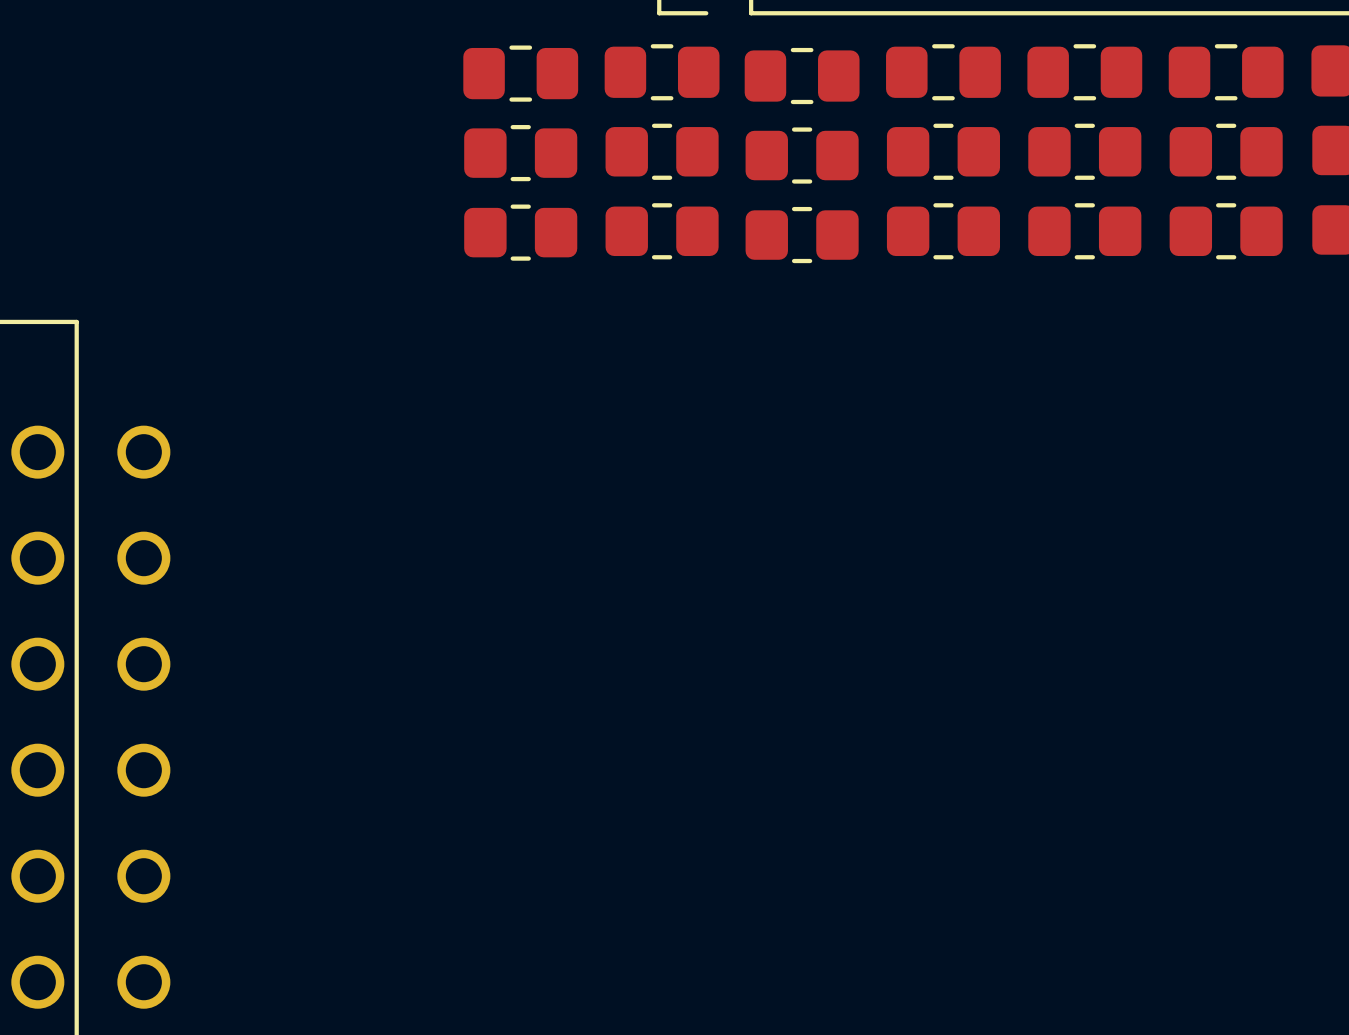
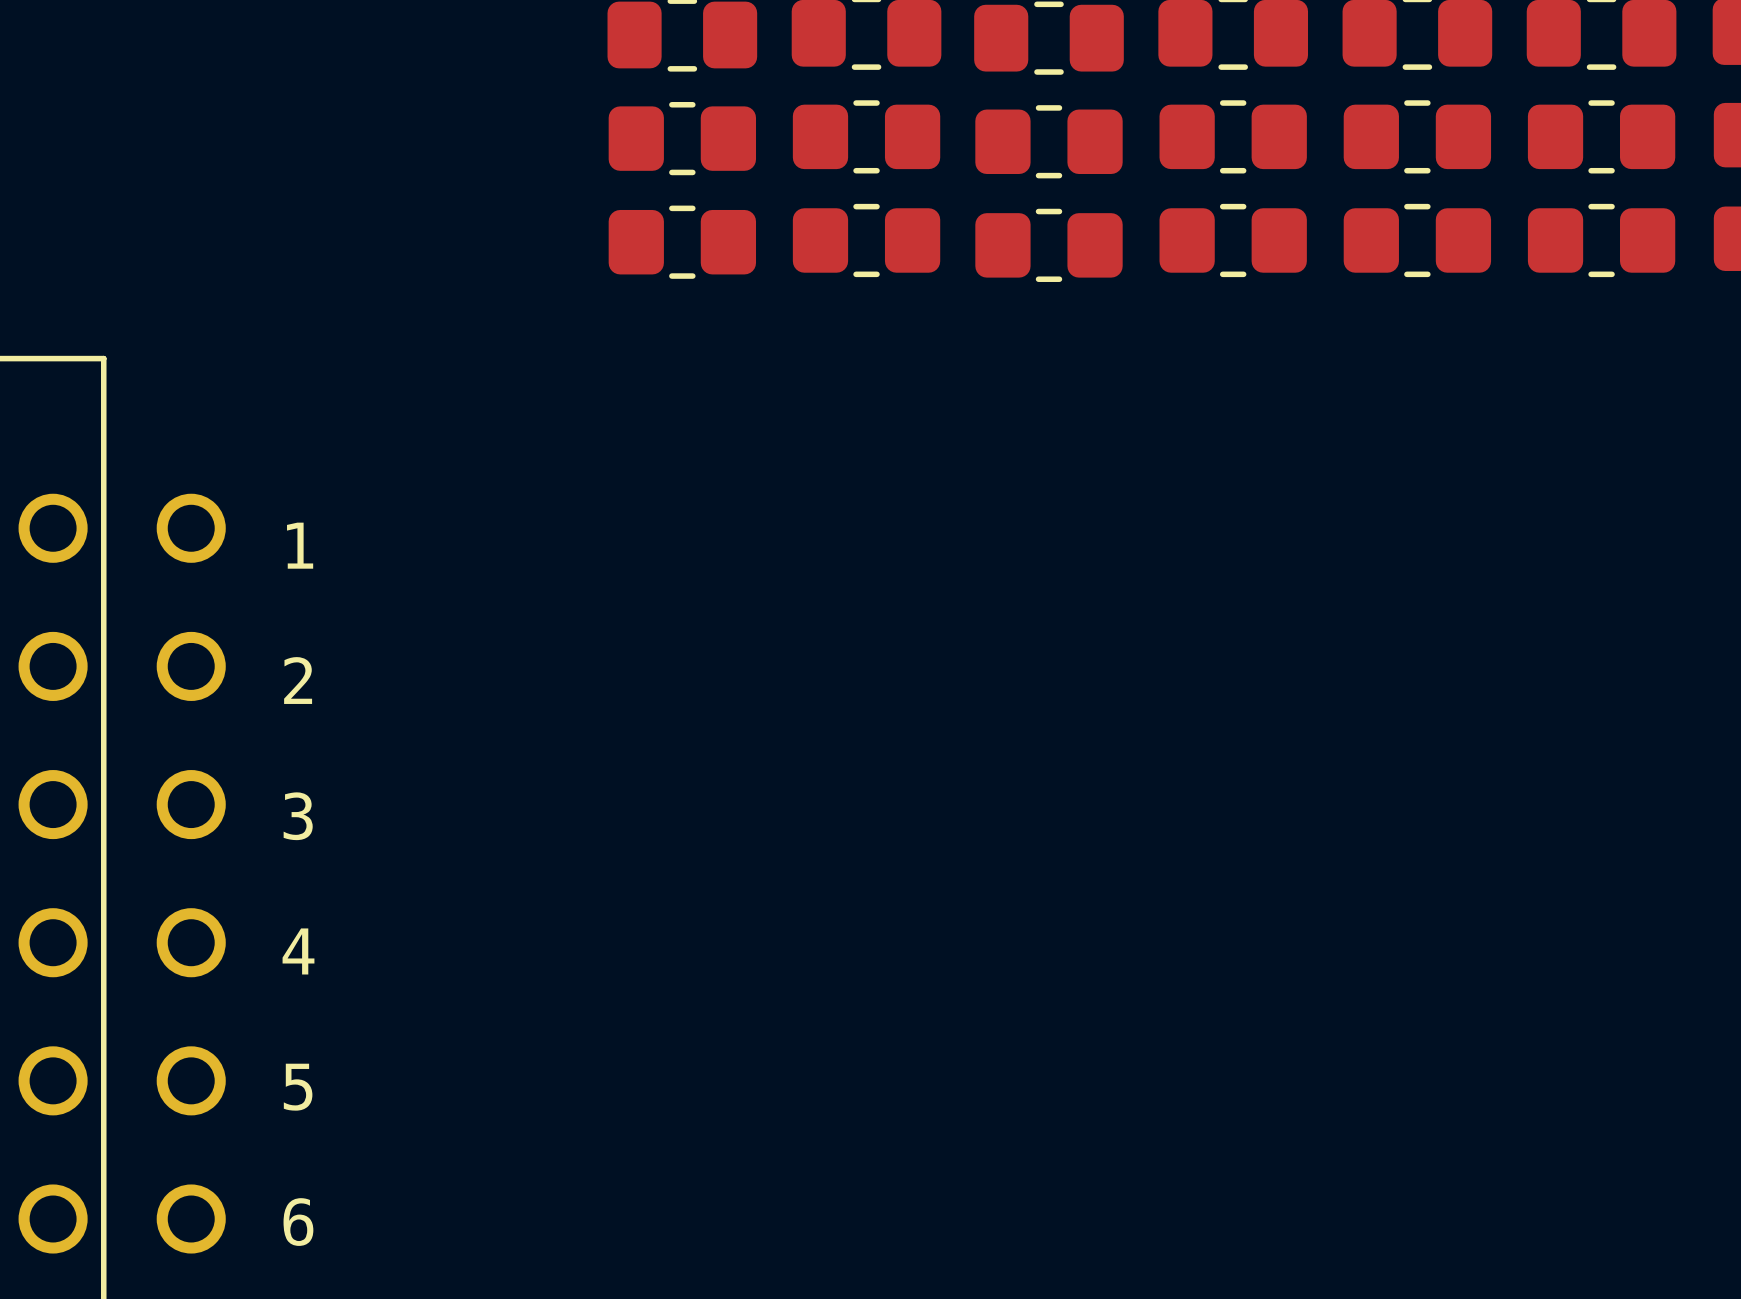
text: none -> 1 (300, 545)
text: none -> 2 (298, 680)
text: none -> 3 (298, 816)
text: none -> 4 (298, 951)
text: none -> 5 (298, 1087)
text: none -> 6 (298, 1222)

